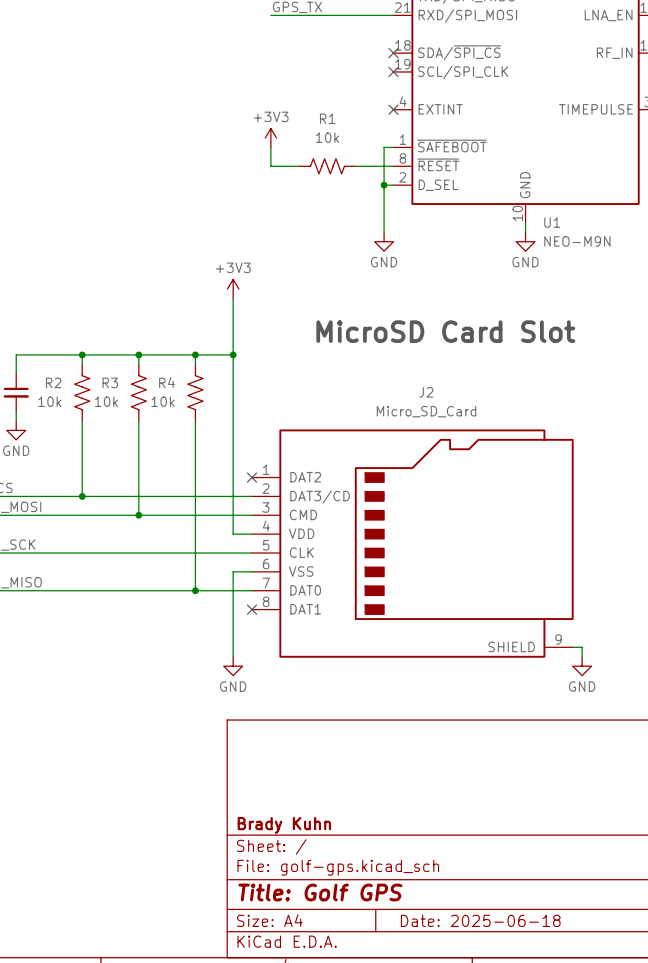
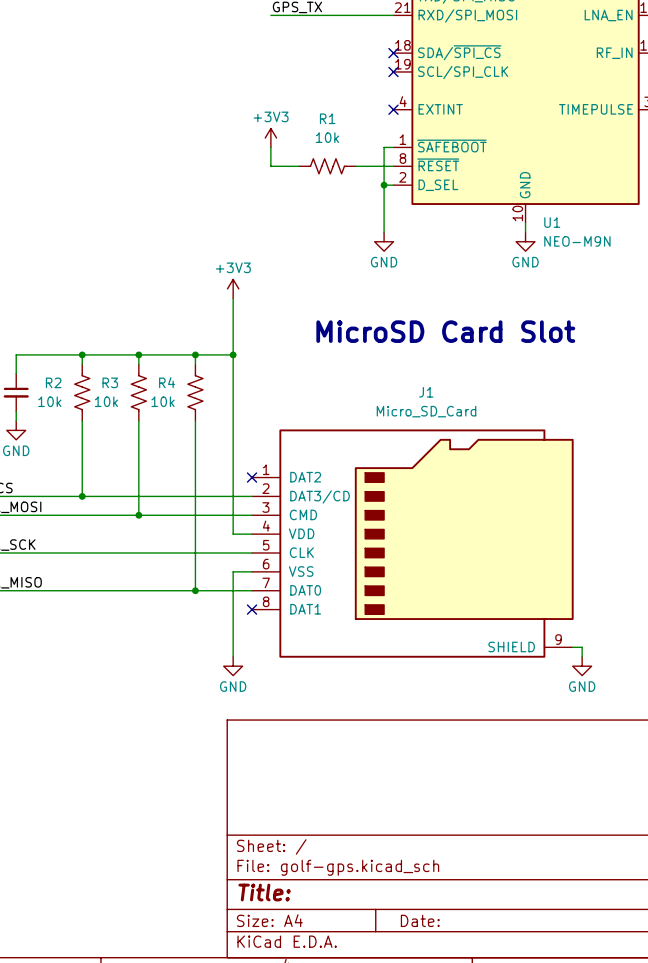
J2 name: J2 (426, 392) -> J1 (426, 392)
title block: Brady Kuhn (284, 825) -> none
title block: Title: Golf GPS (320, 892) -> Title: (264, 892)
title block: Date: 2025-06-18 (480, 920) -> Date: (420, 920)

